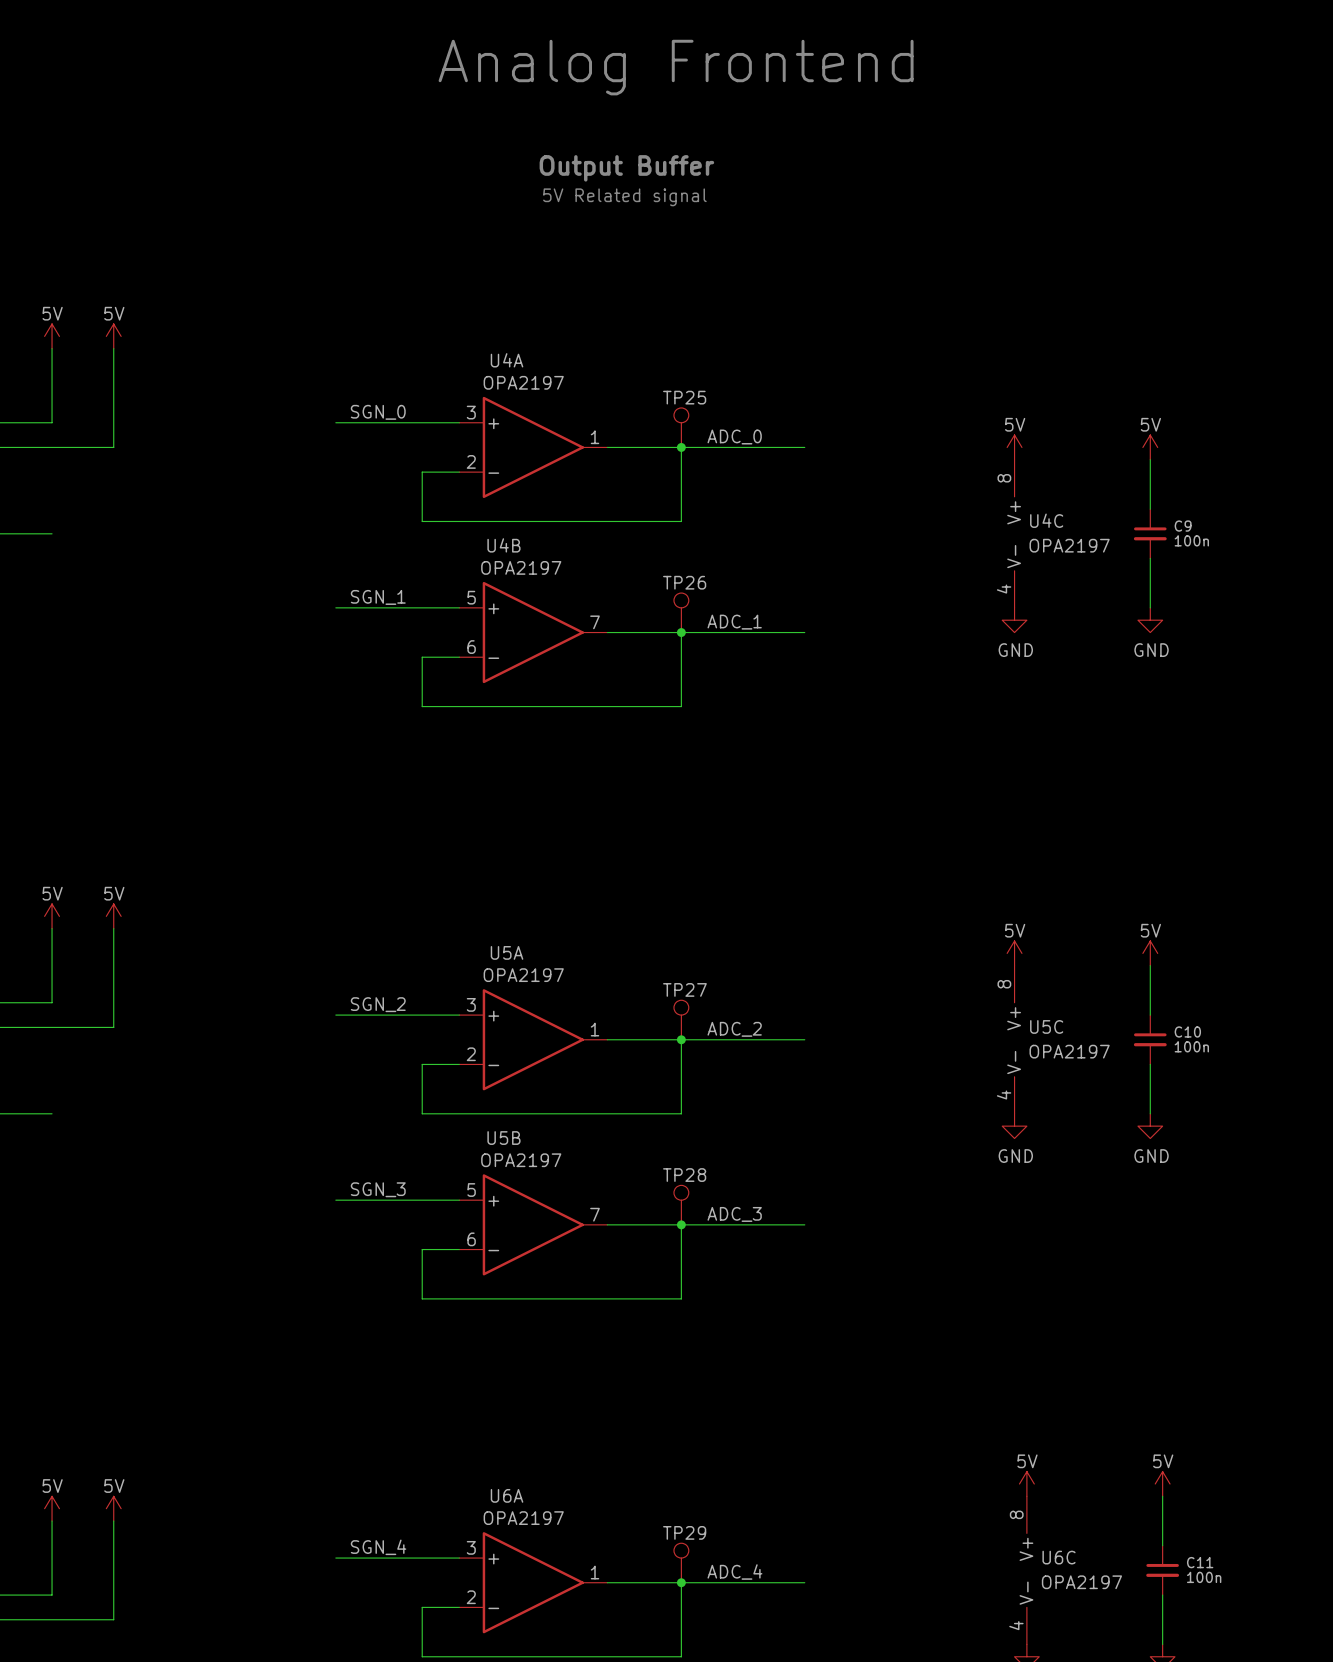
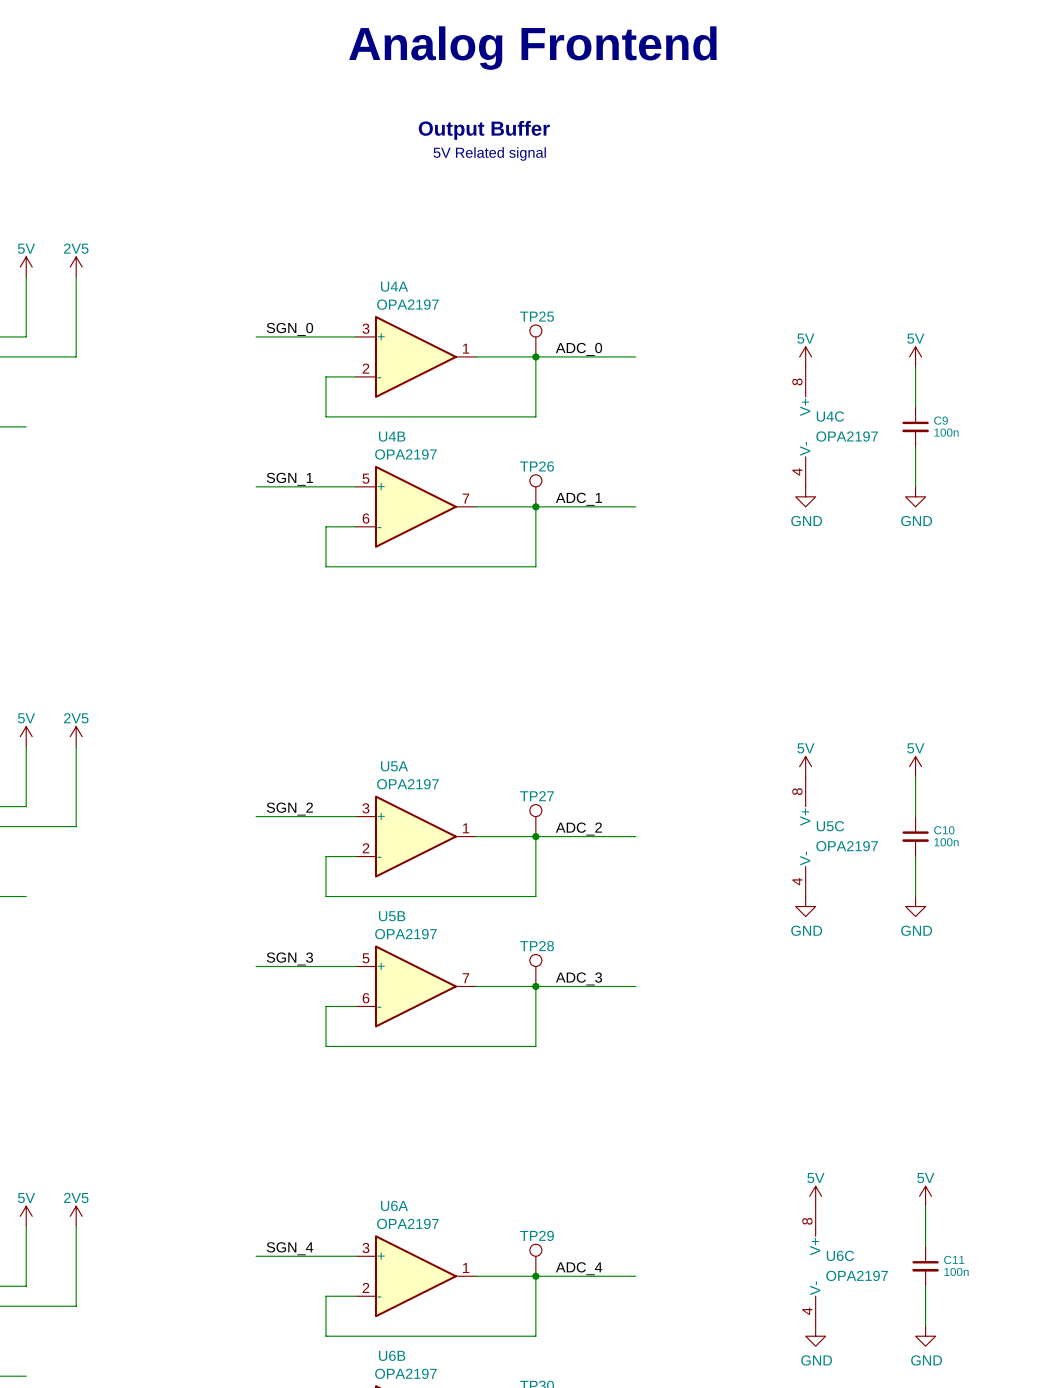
power symbol: 5V (113, 336) -> 2V5 (76, 267)
power symbol: 5V (113, 916) -> 2V5 (76, 736)
power symbol: 5V (113, 1508) -> 2V5 (76, 1216)

